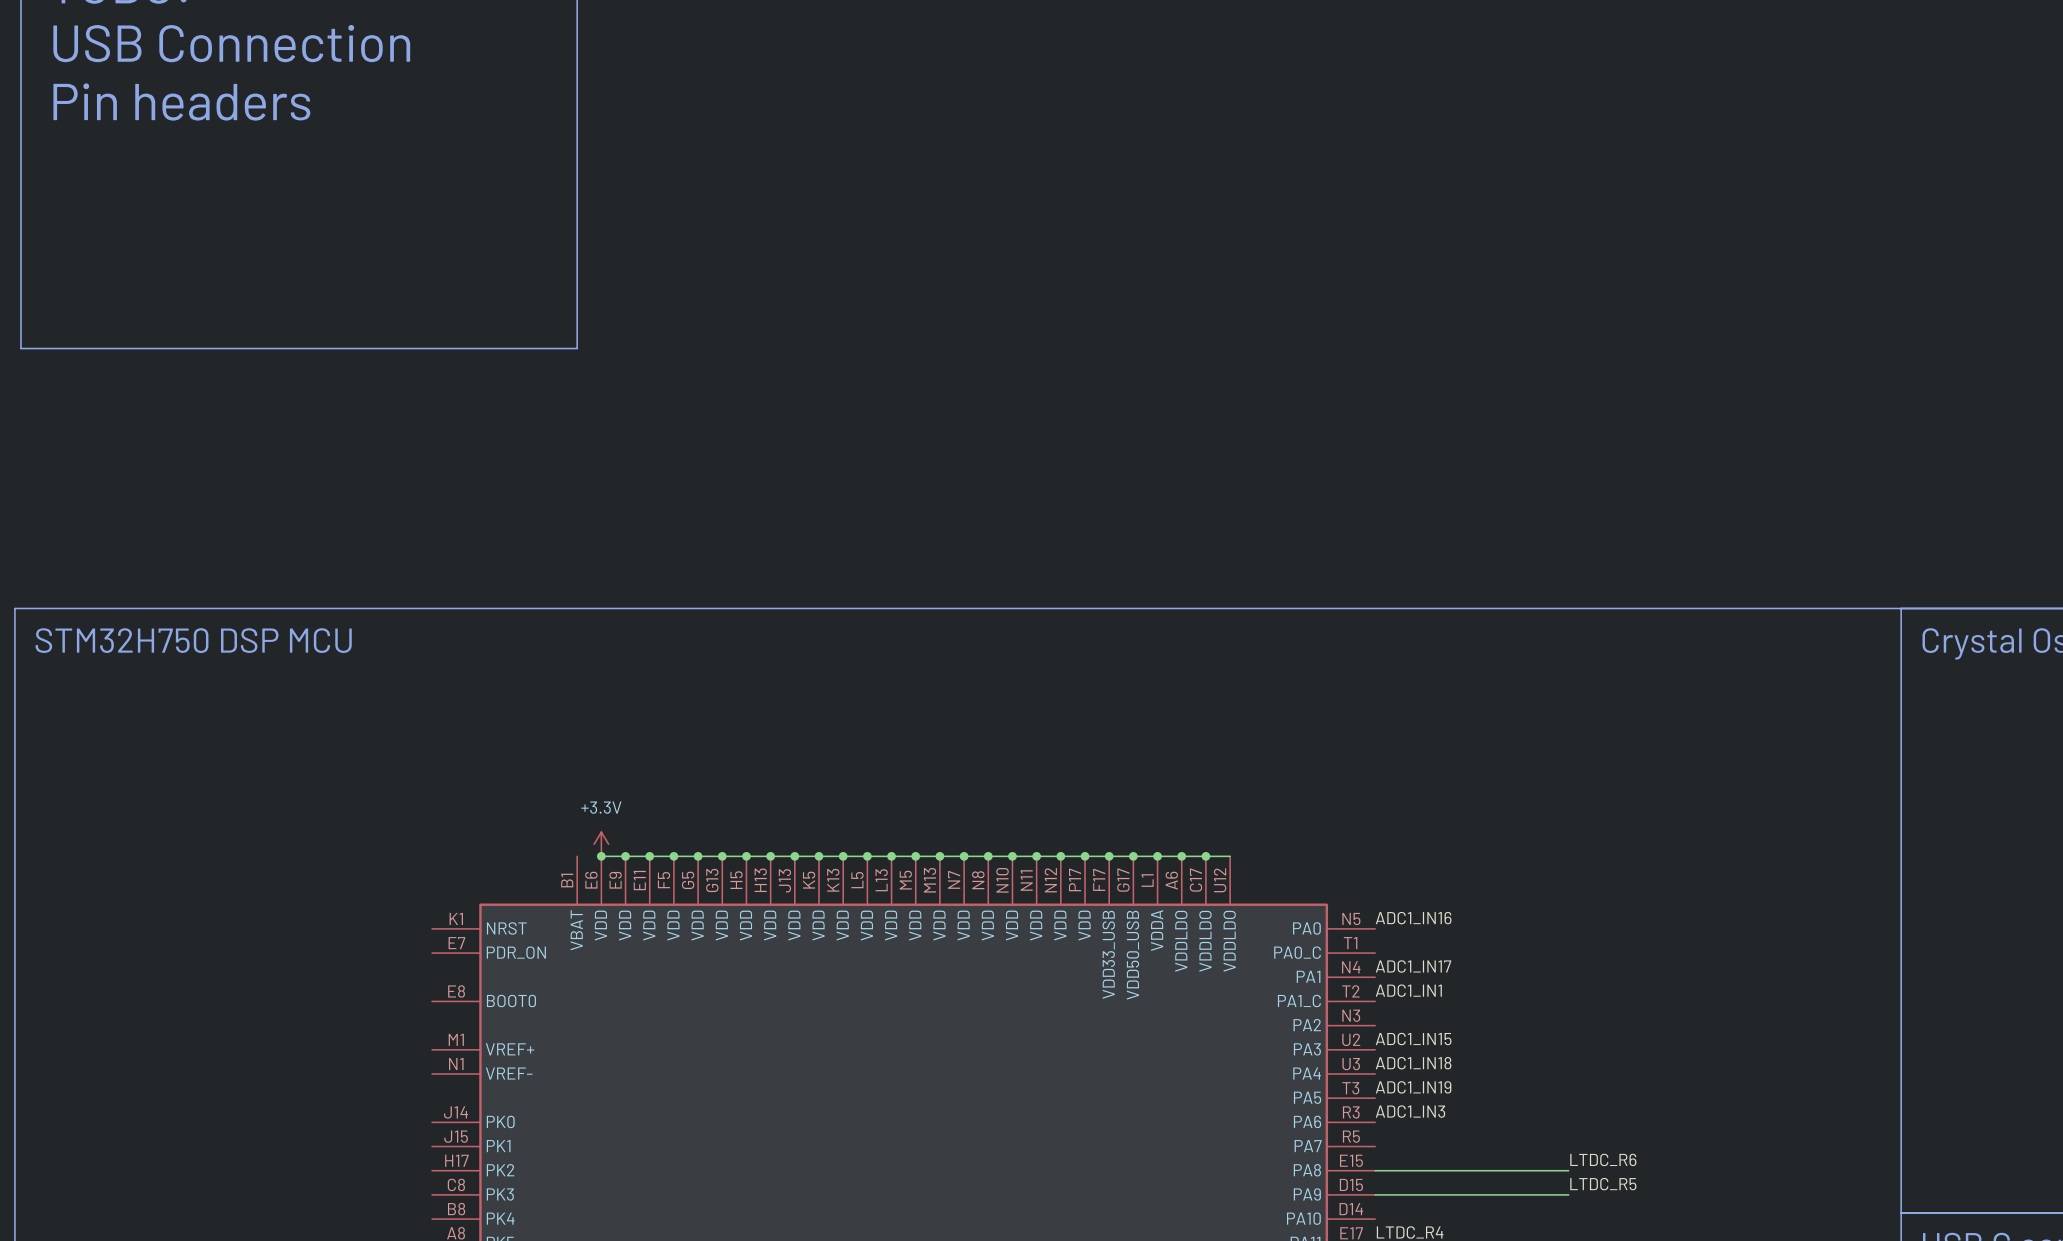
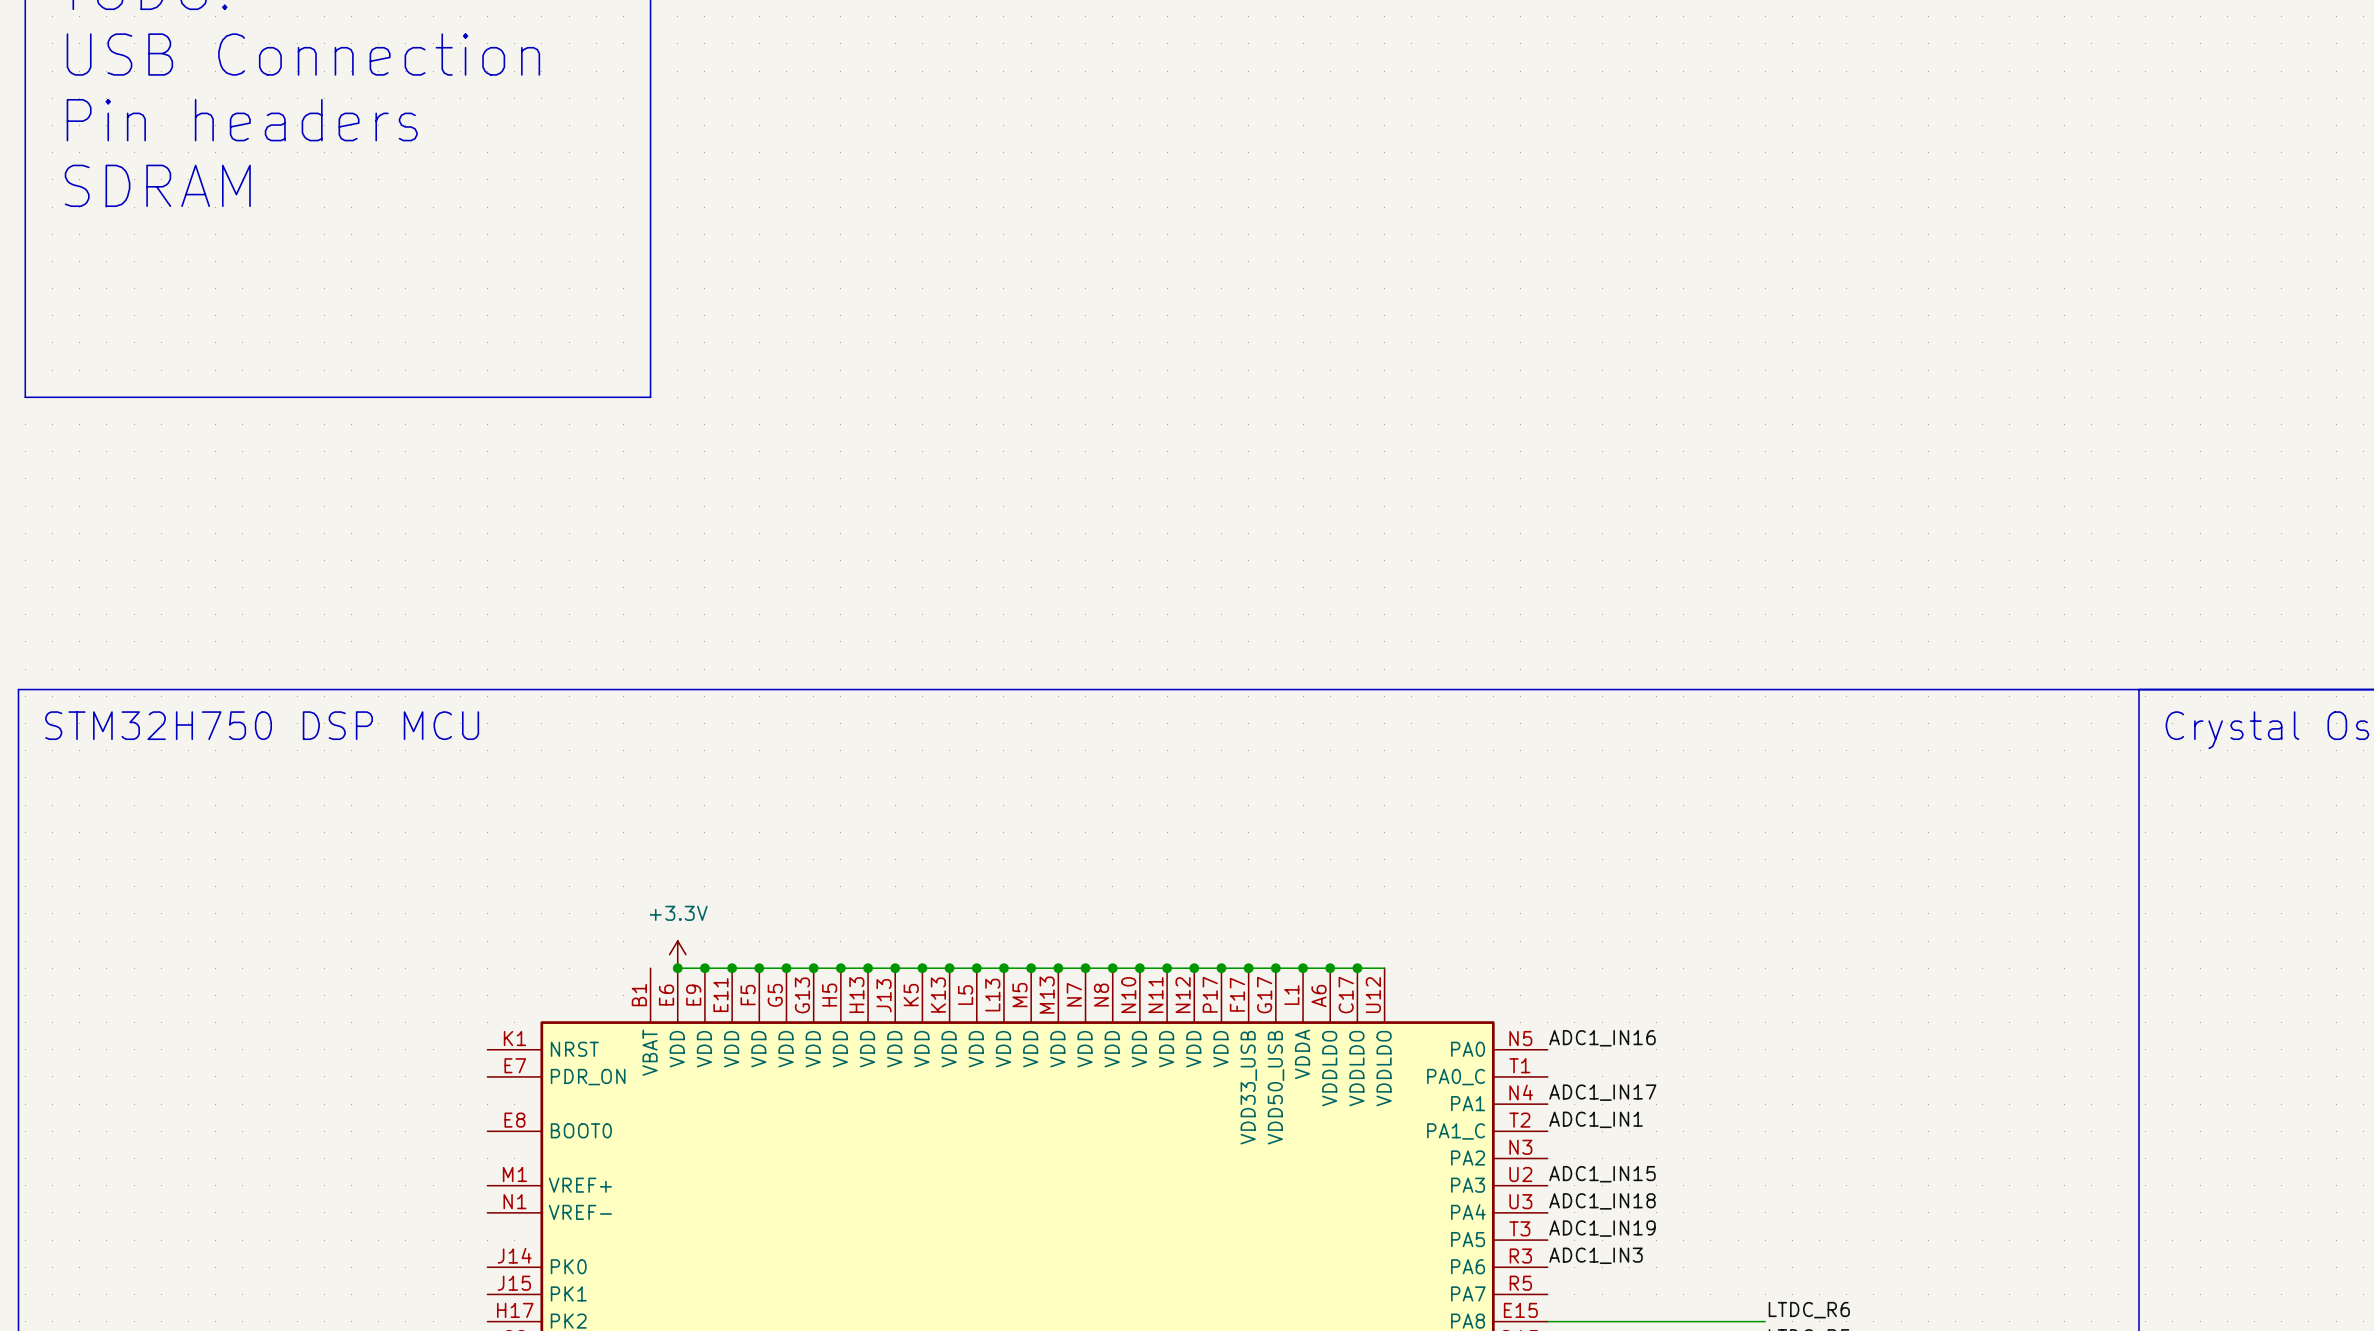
text: none -> SDRAM (157, 185)

